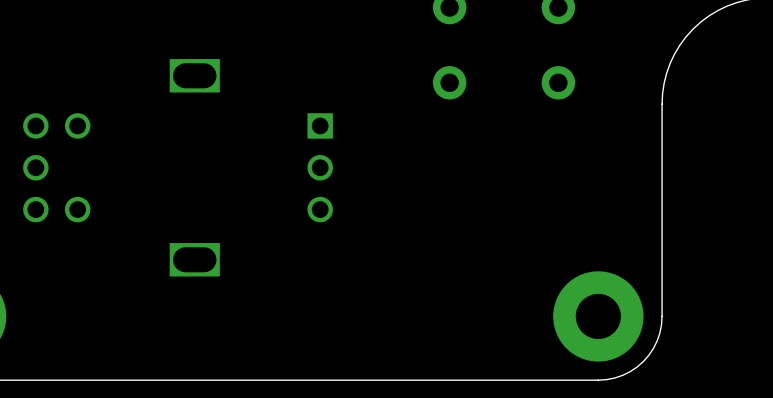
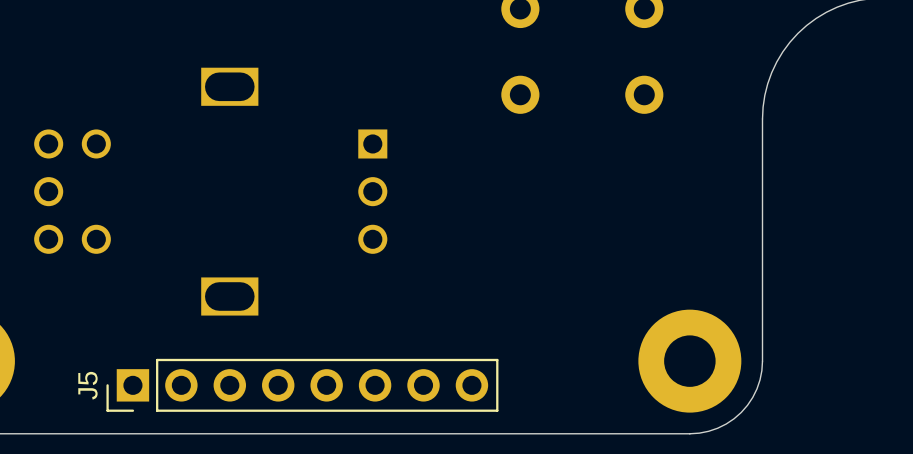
J5: none -> (302, 385)

